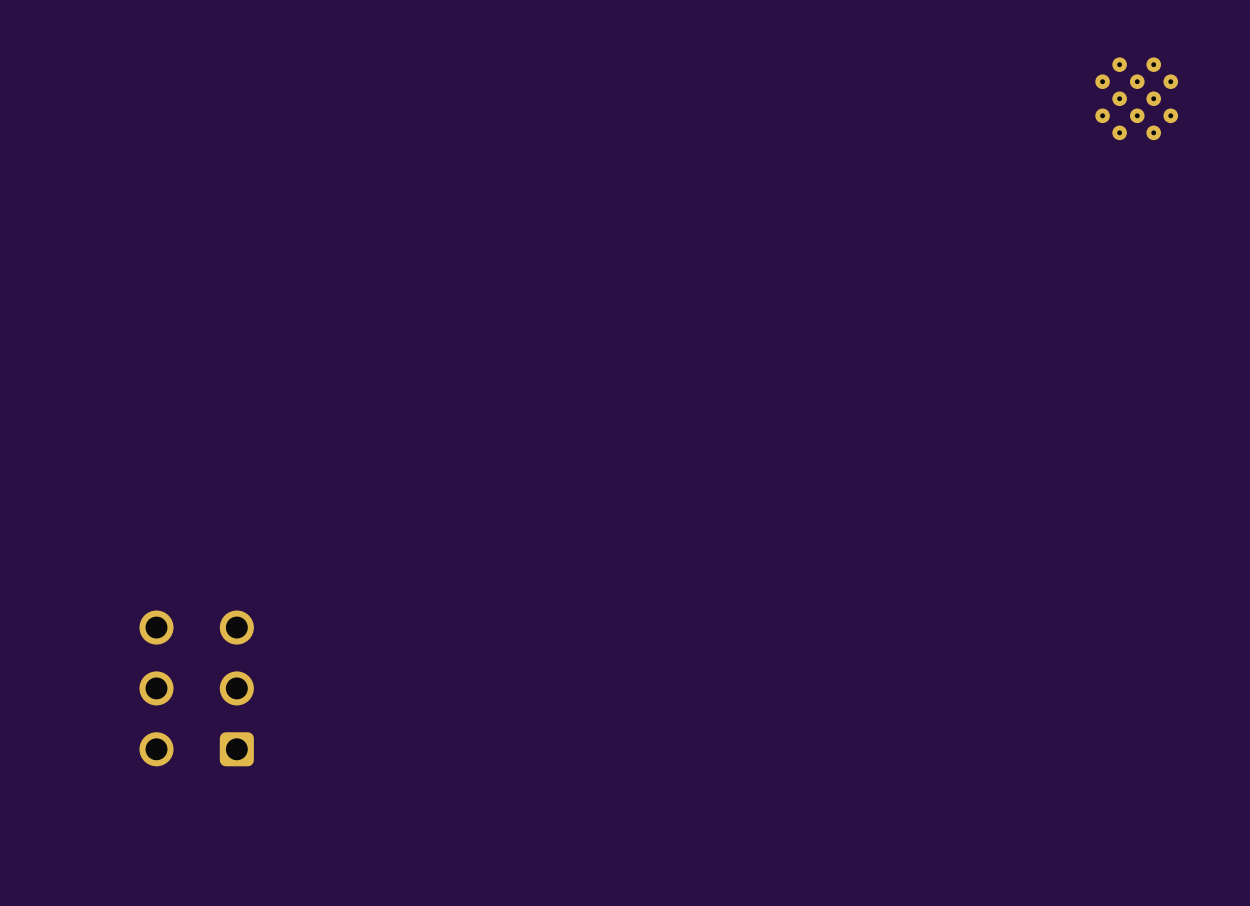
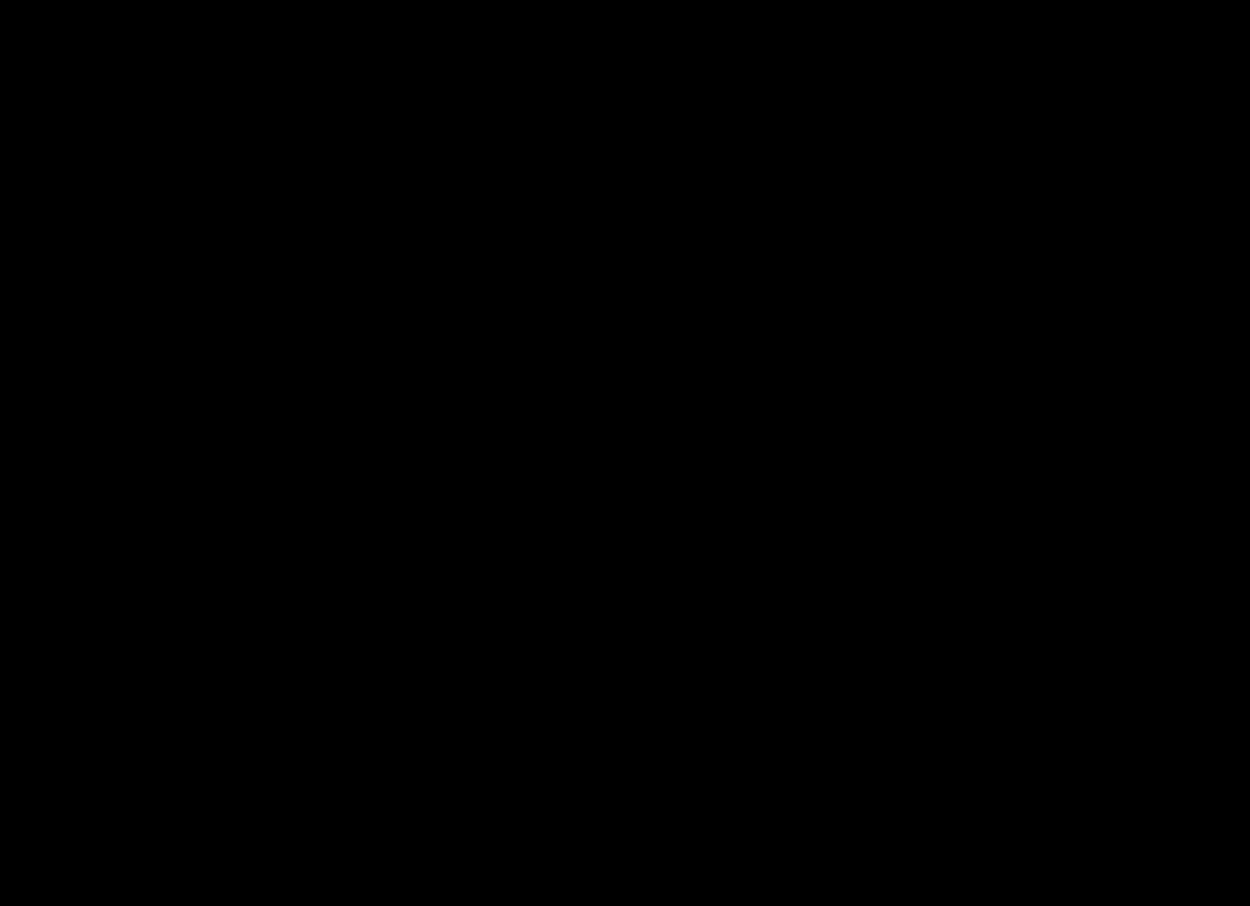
part: (1136, 98) -> none
part: (196, 688) -> none

